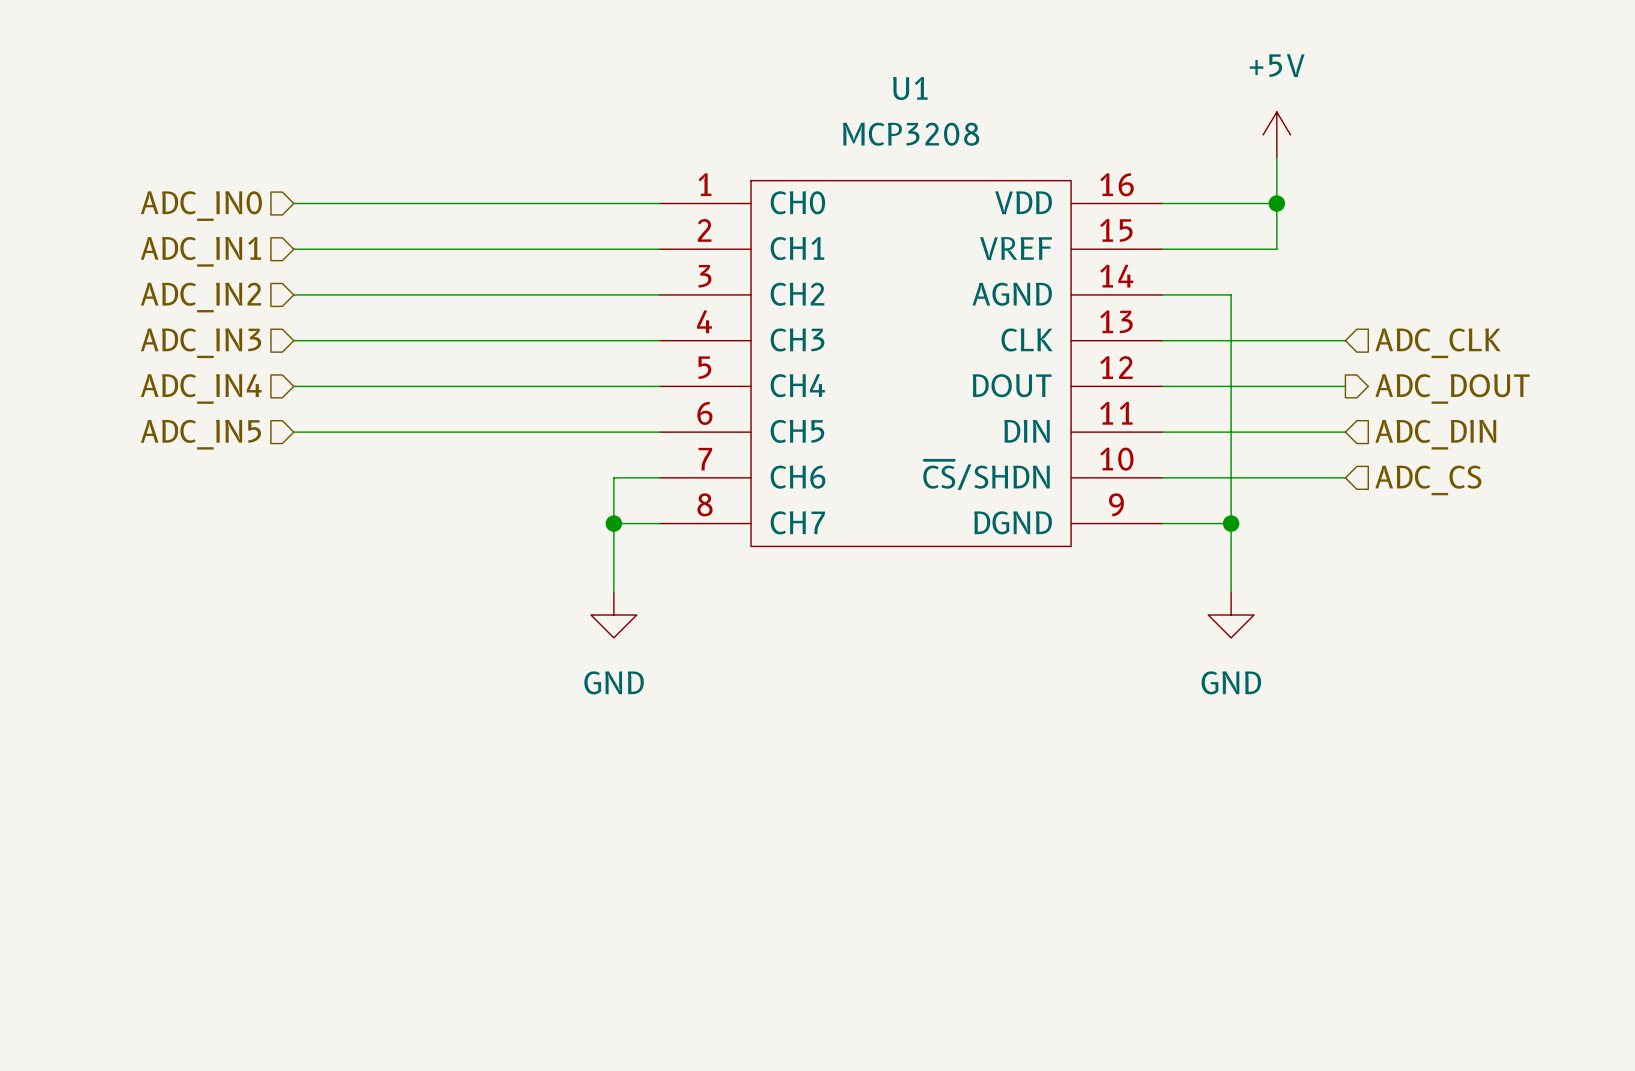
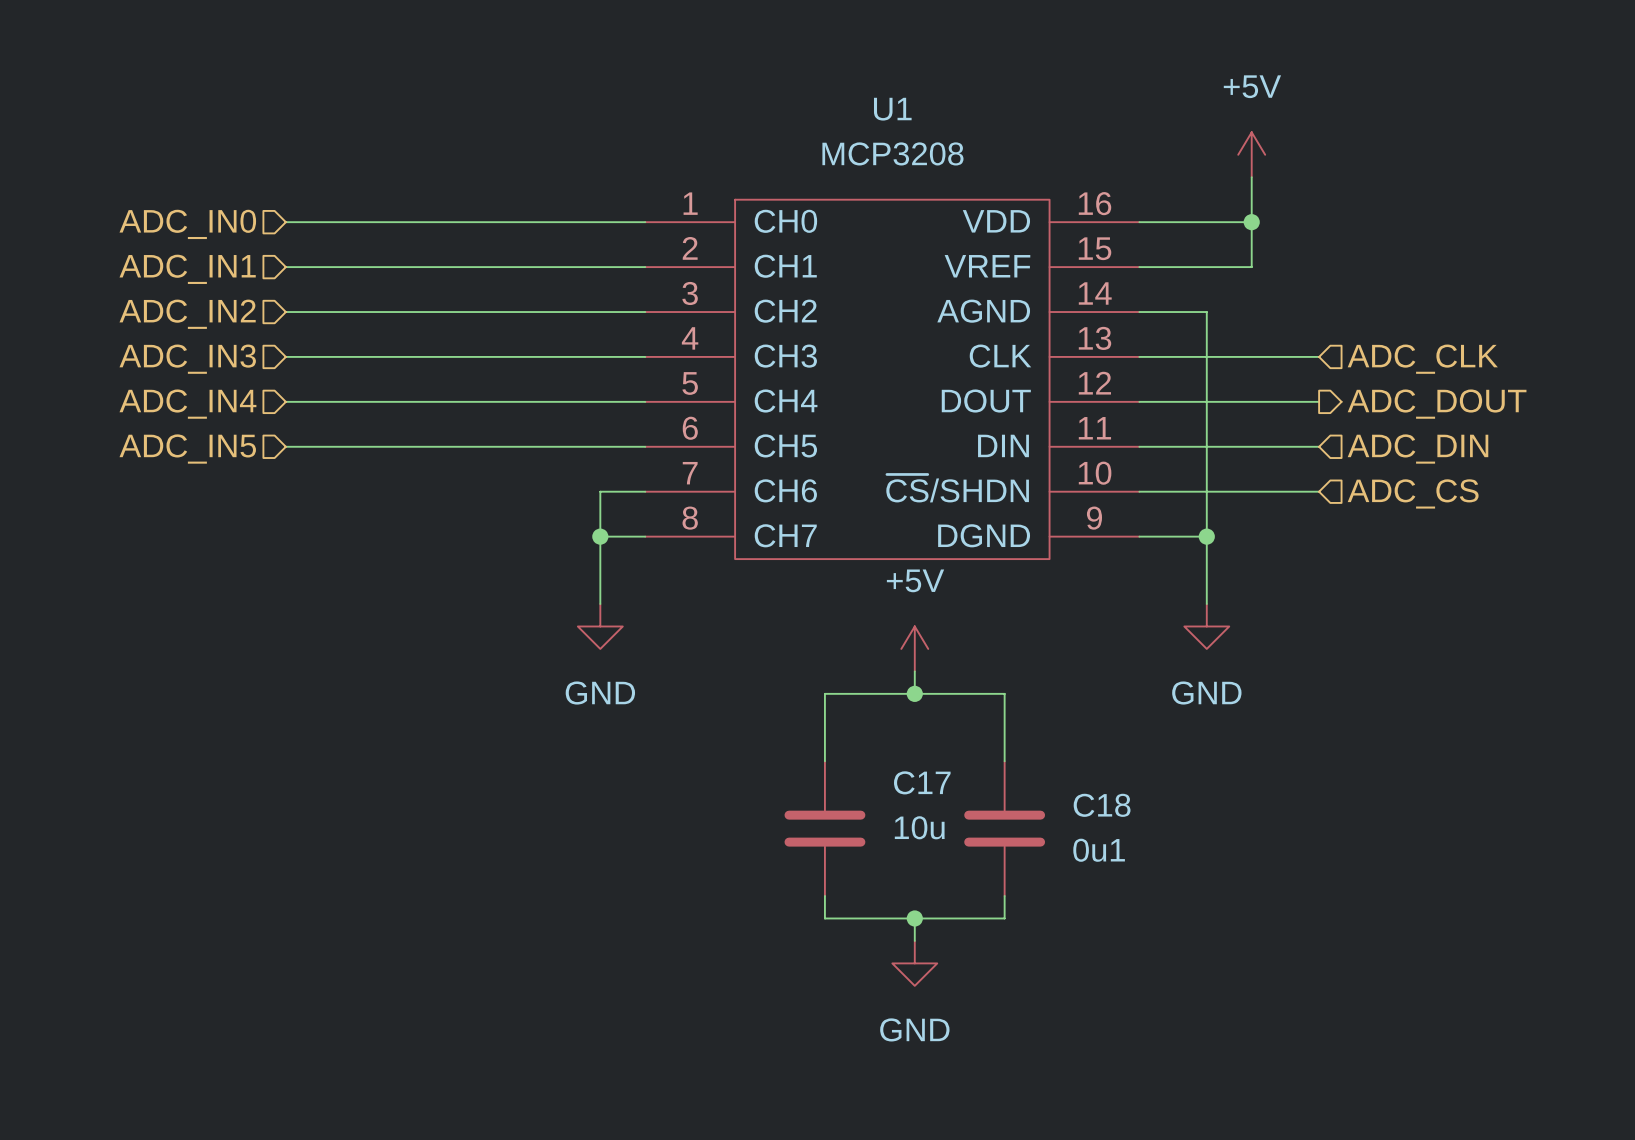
power symbol: none -> +5V (914, 648)
wire: none -> (914, 671) (914, 693)
junction: none -> (914, 693)
wire: none -> (824, 761) (824, 693) (1004, 693) (1004, 761)
C17: none -> (824, 828)
C18: none -> (1004, 828)
wire: none -> (824, 896) (824, 918) (1004, 918) (1004, 896)
wire: none -> (914, 918) (914, 940)
junction: none -> (914, 918)
power symbol: none -> GND (914, 963)

